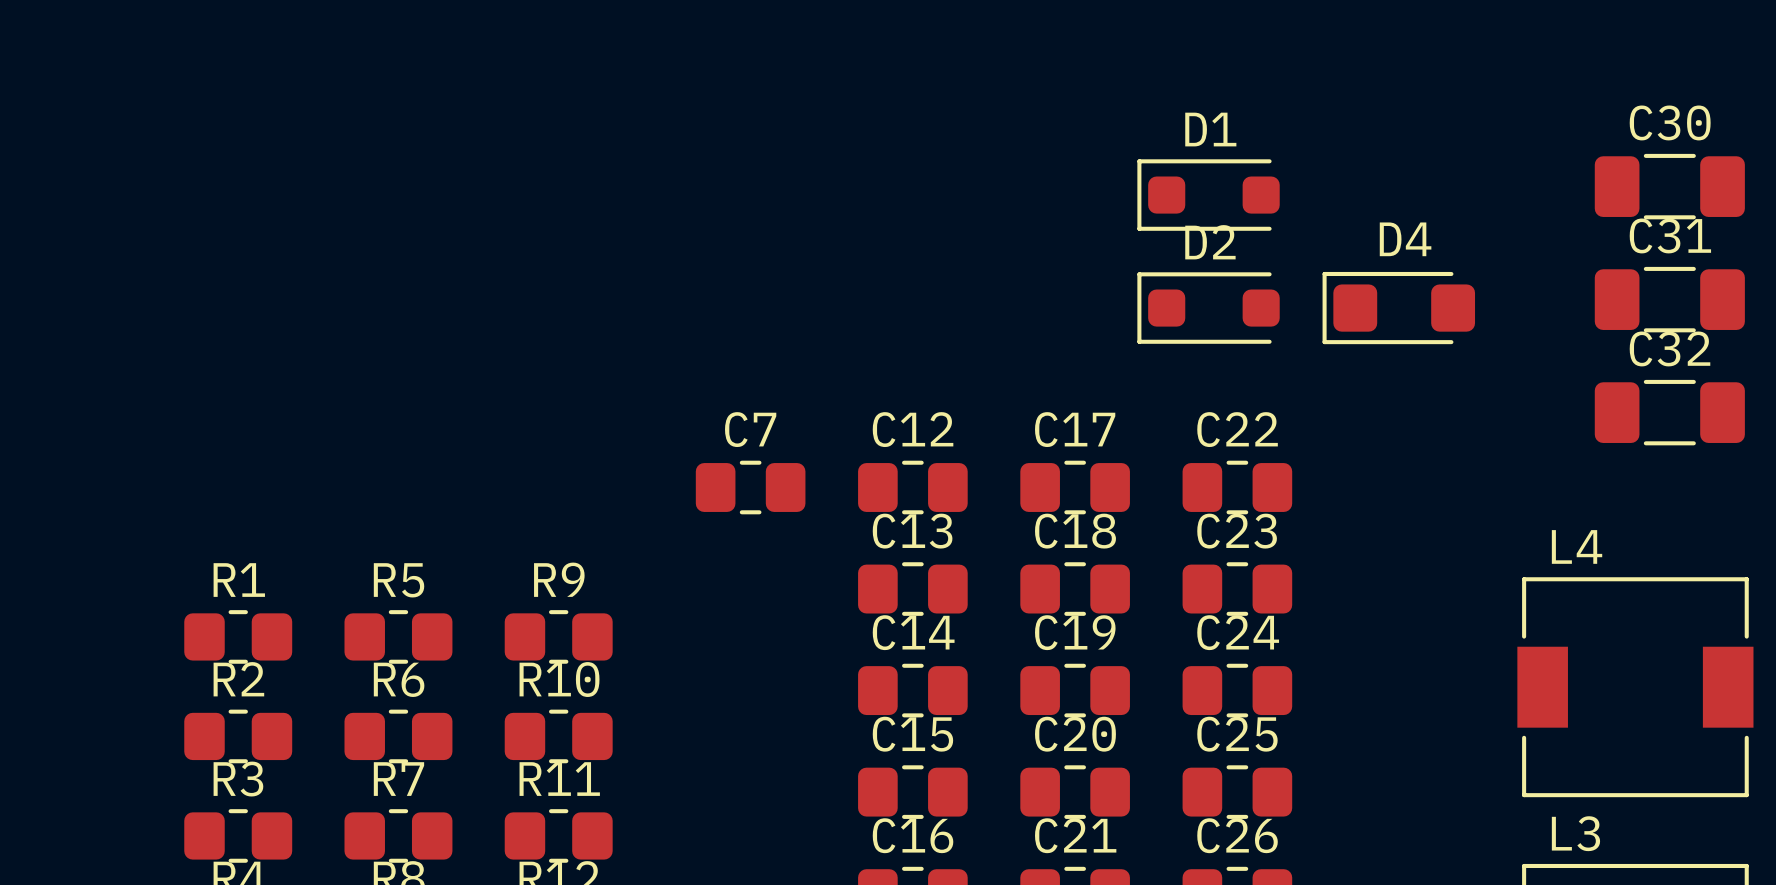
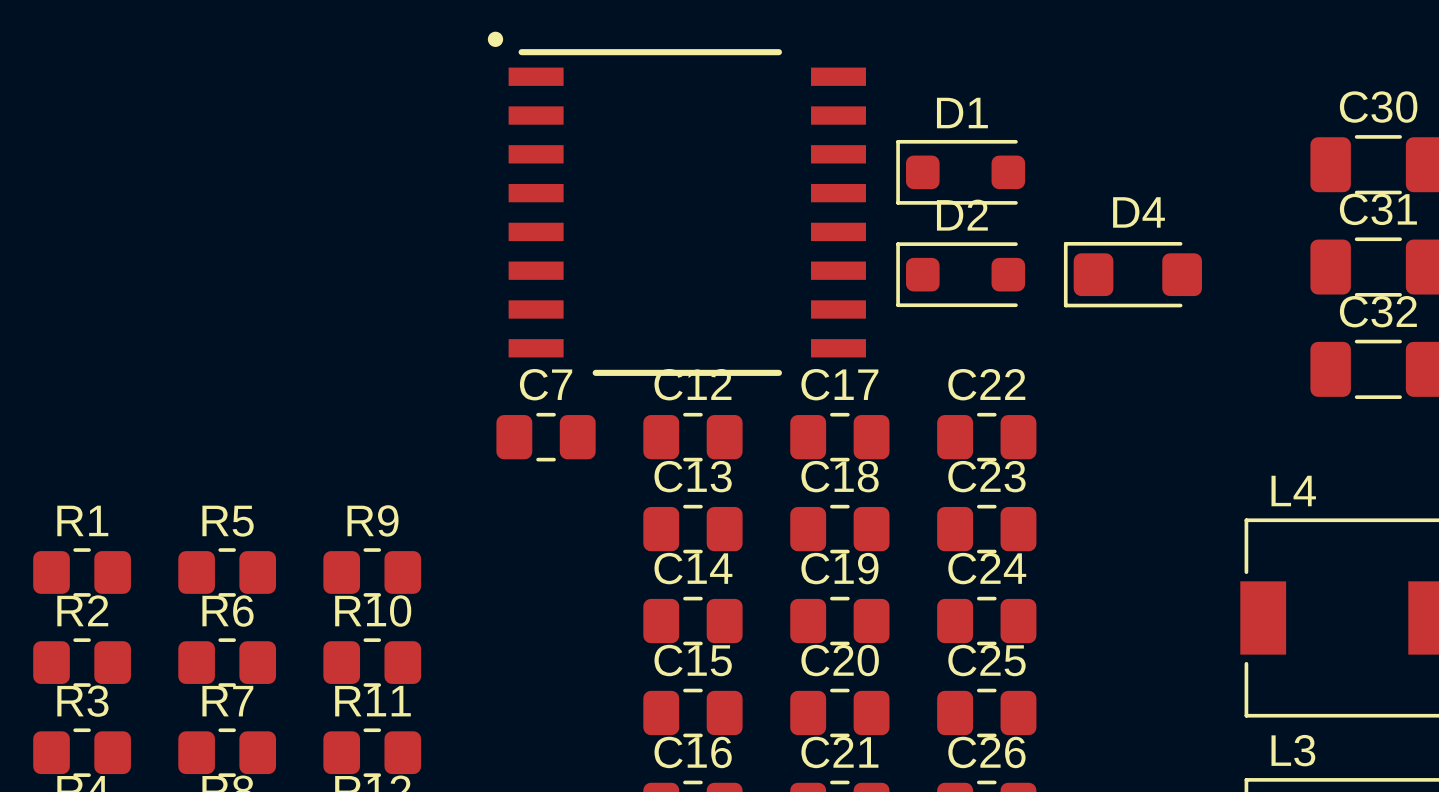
part: none -> (676, 203)

